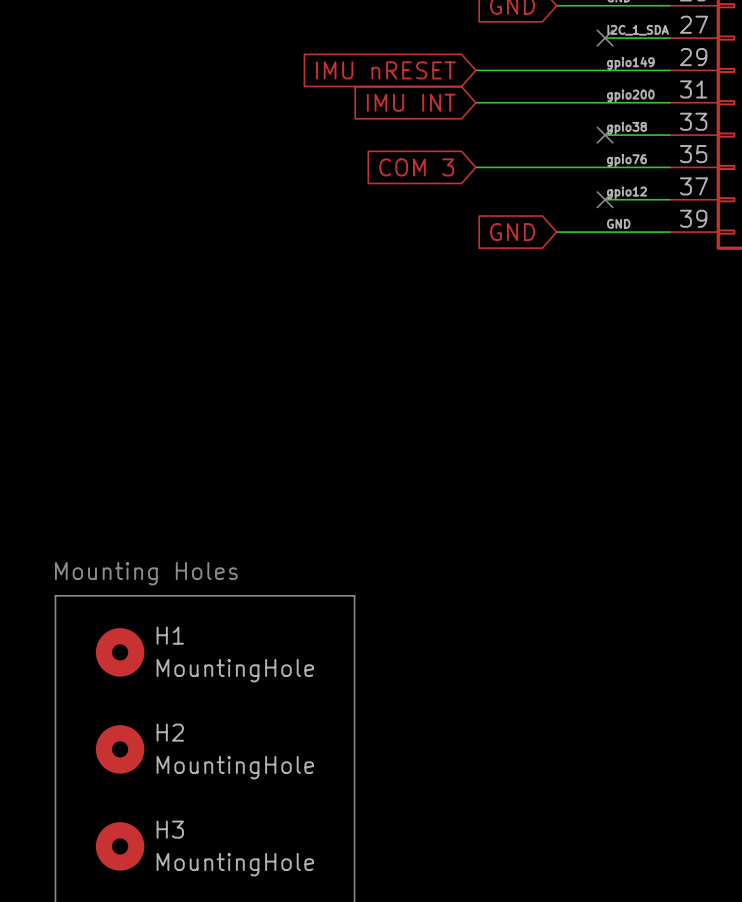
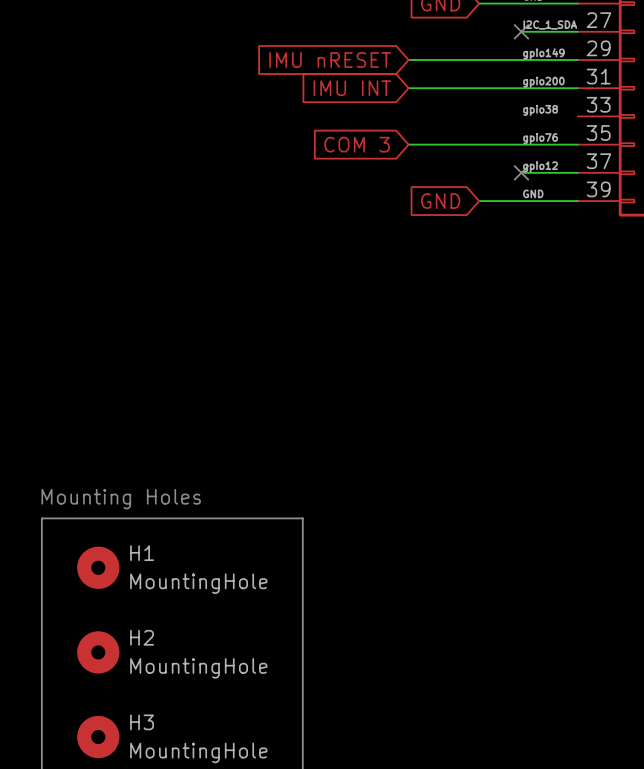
wire: (605, 135) (669, 135) -> none
no-connect mark: (605, 135) -> none

